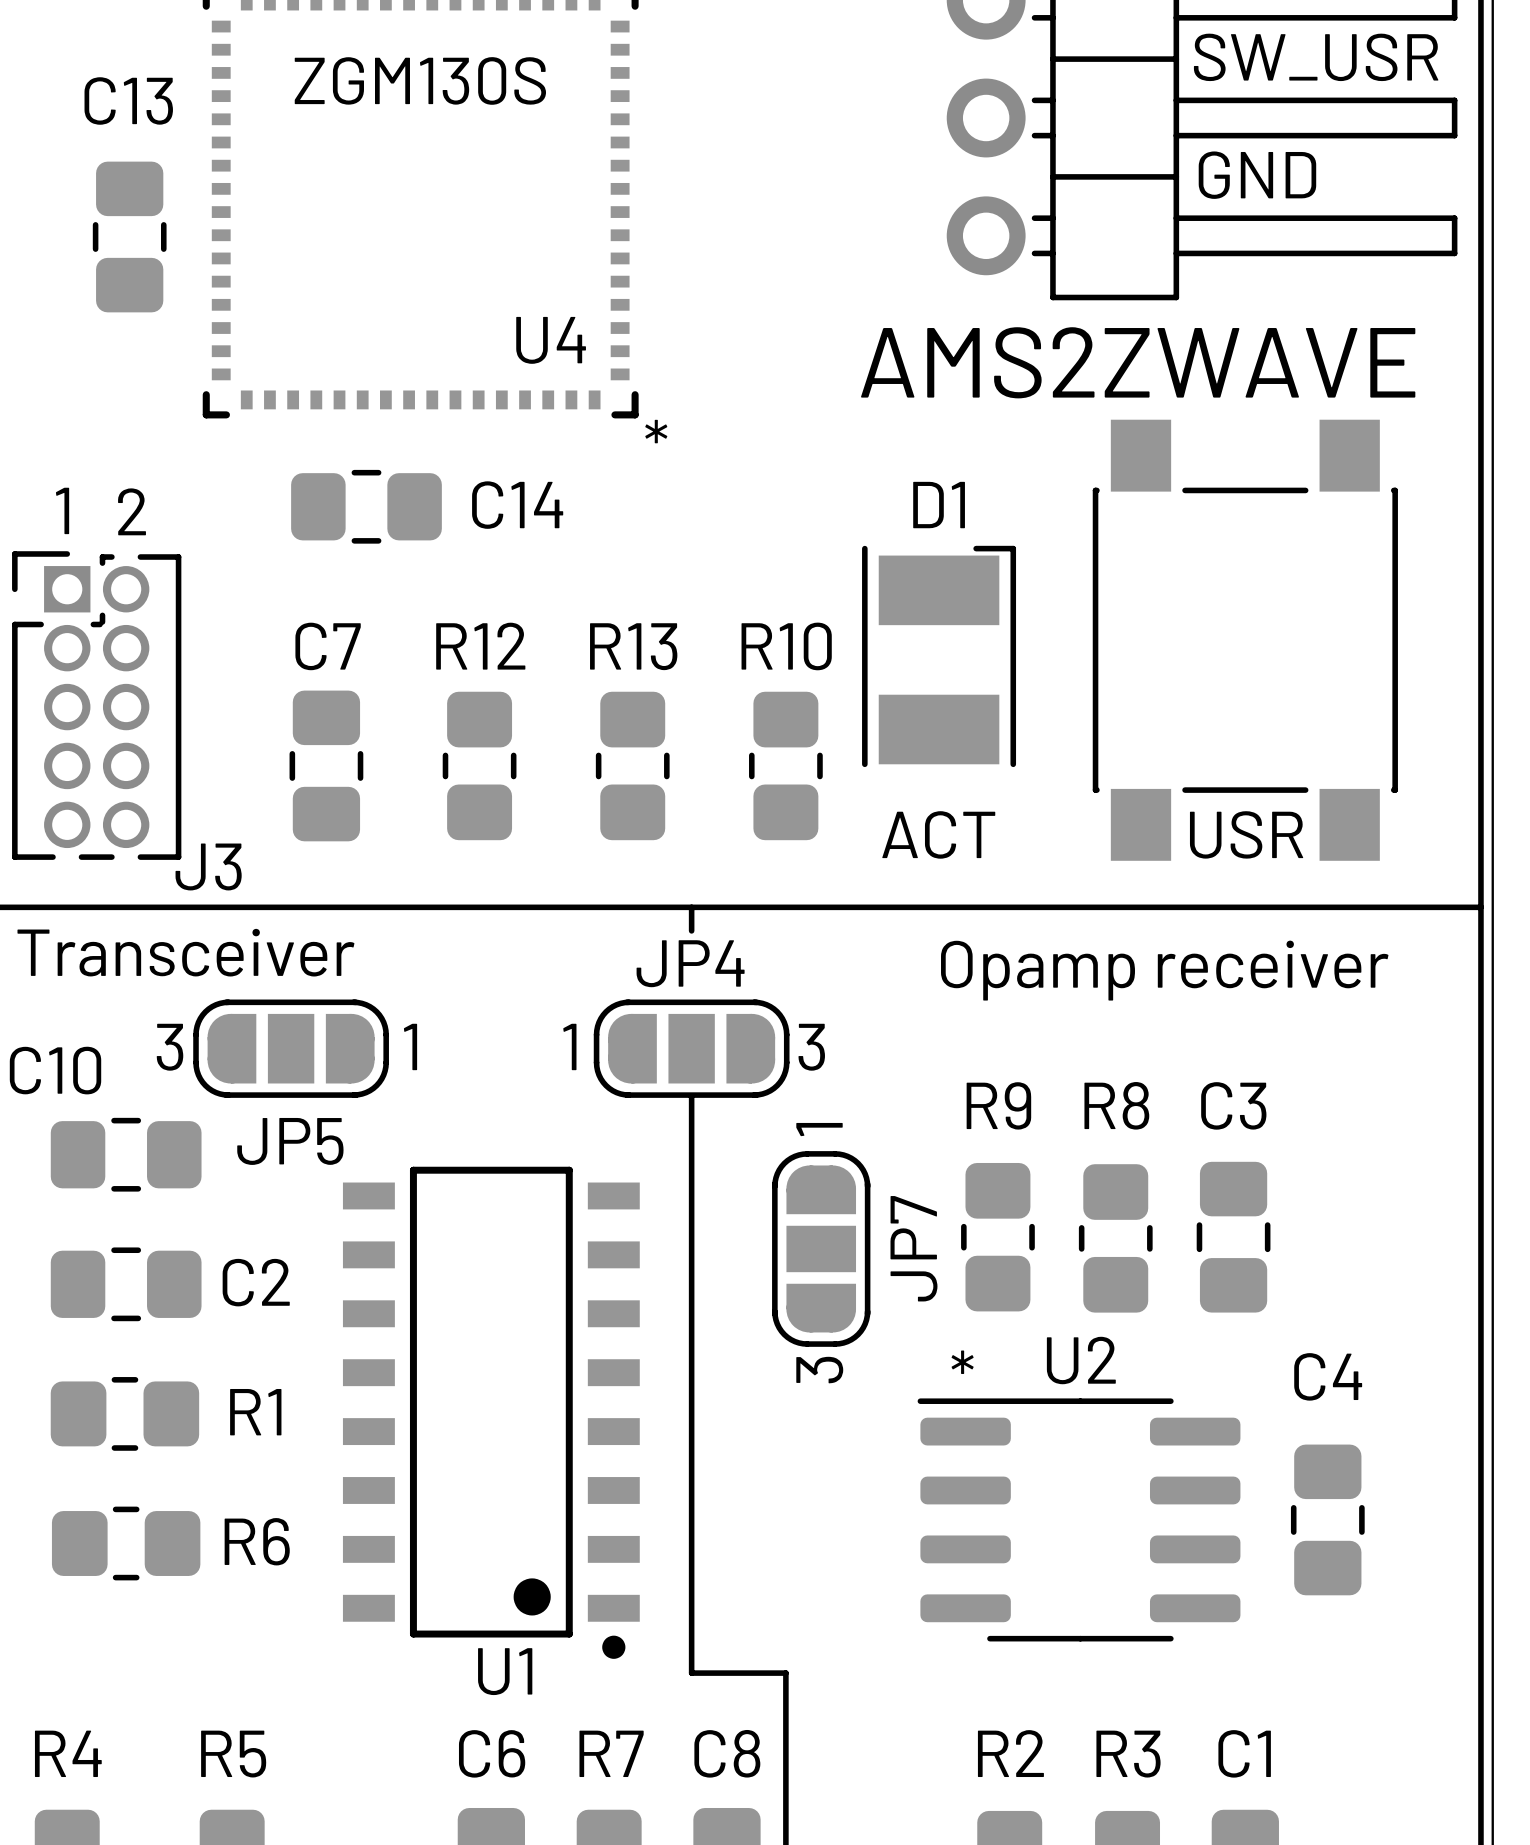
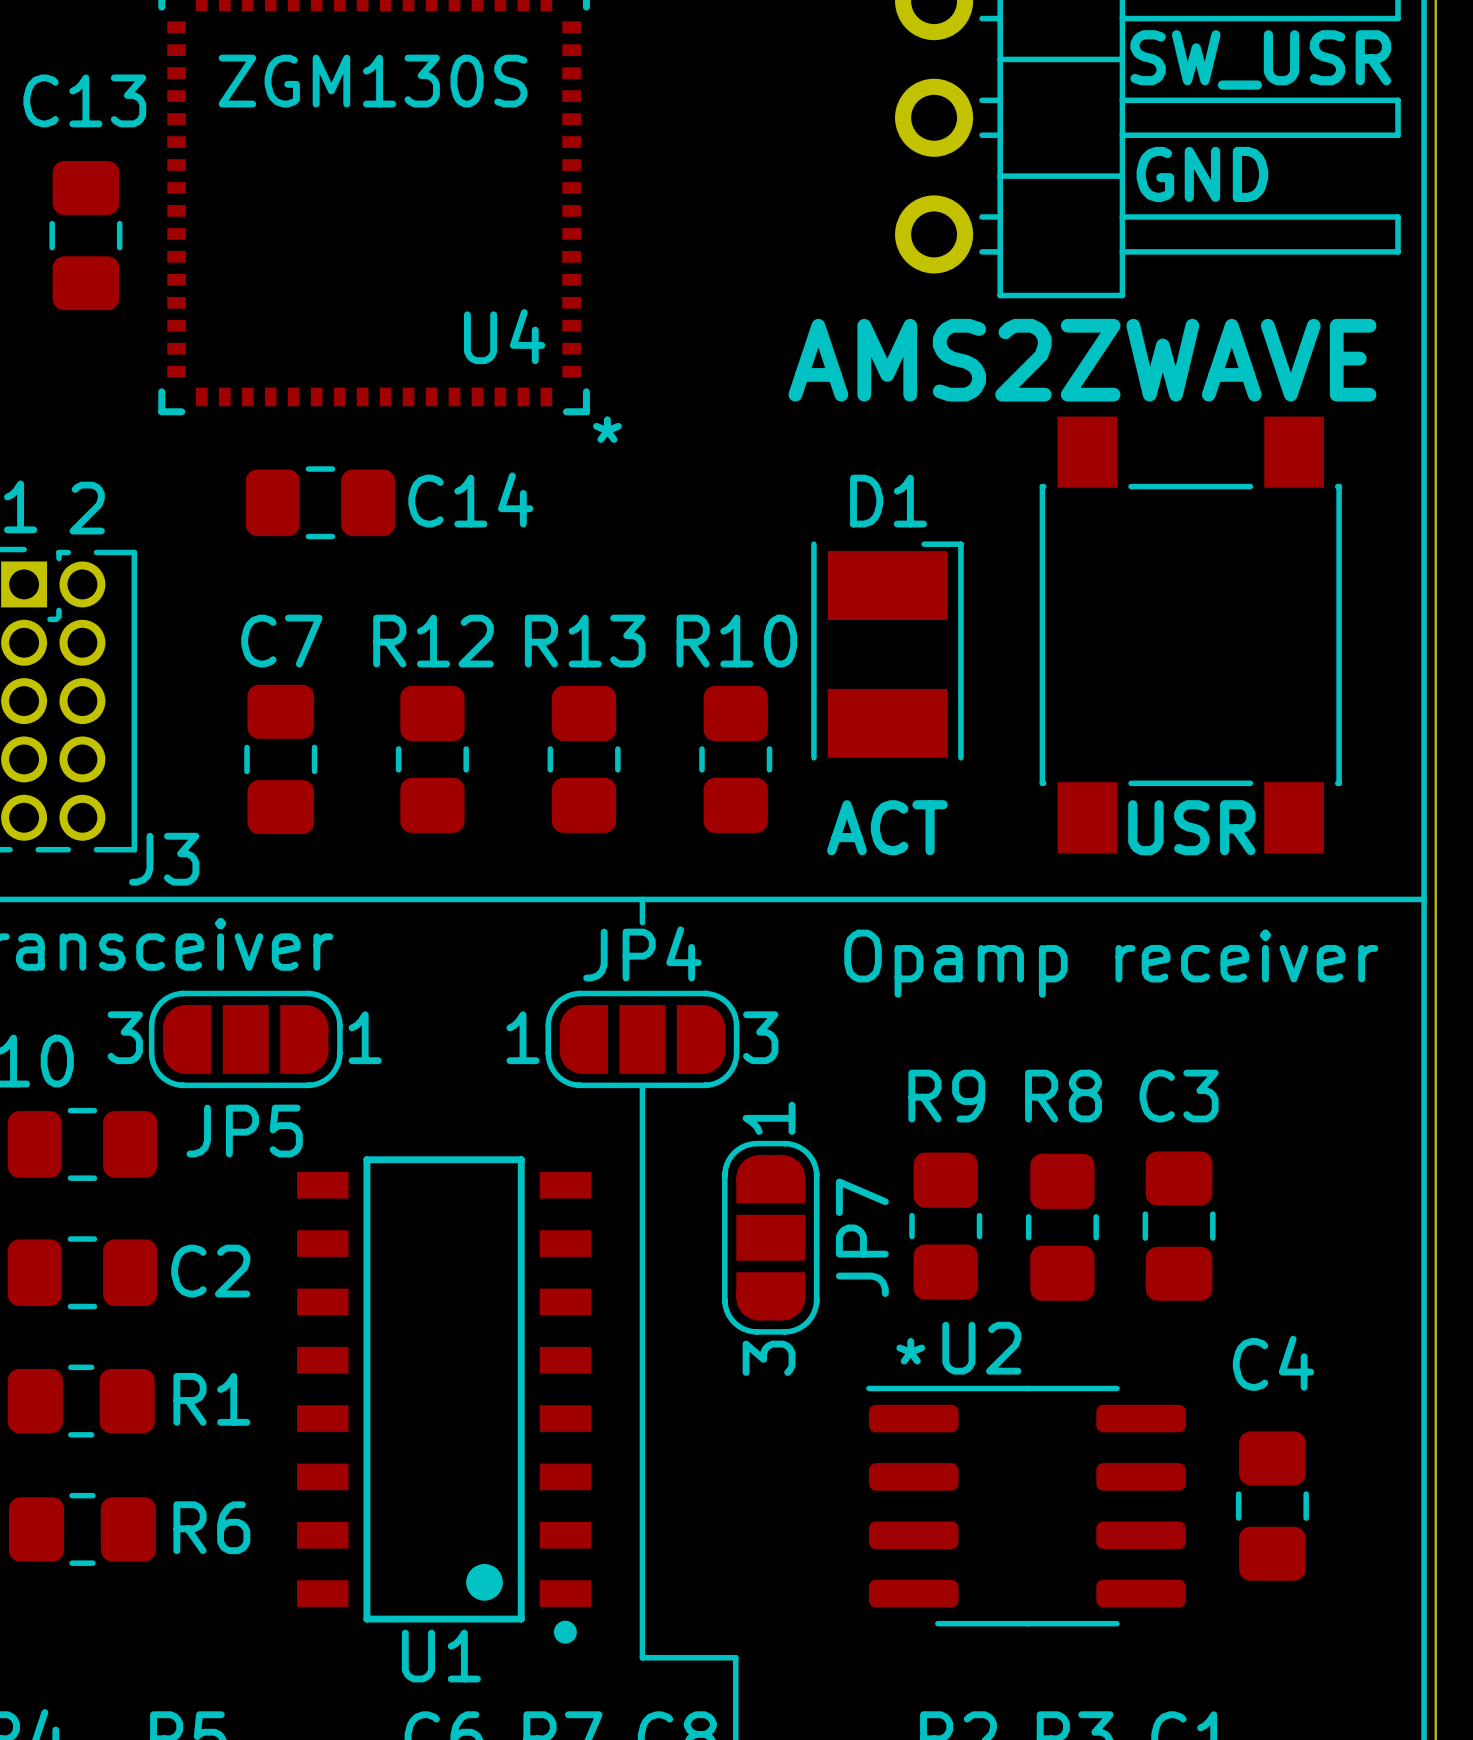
U2 name position: U2 (1081, 1360) -> U2 (981, 1348)

